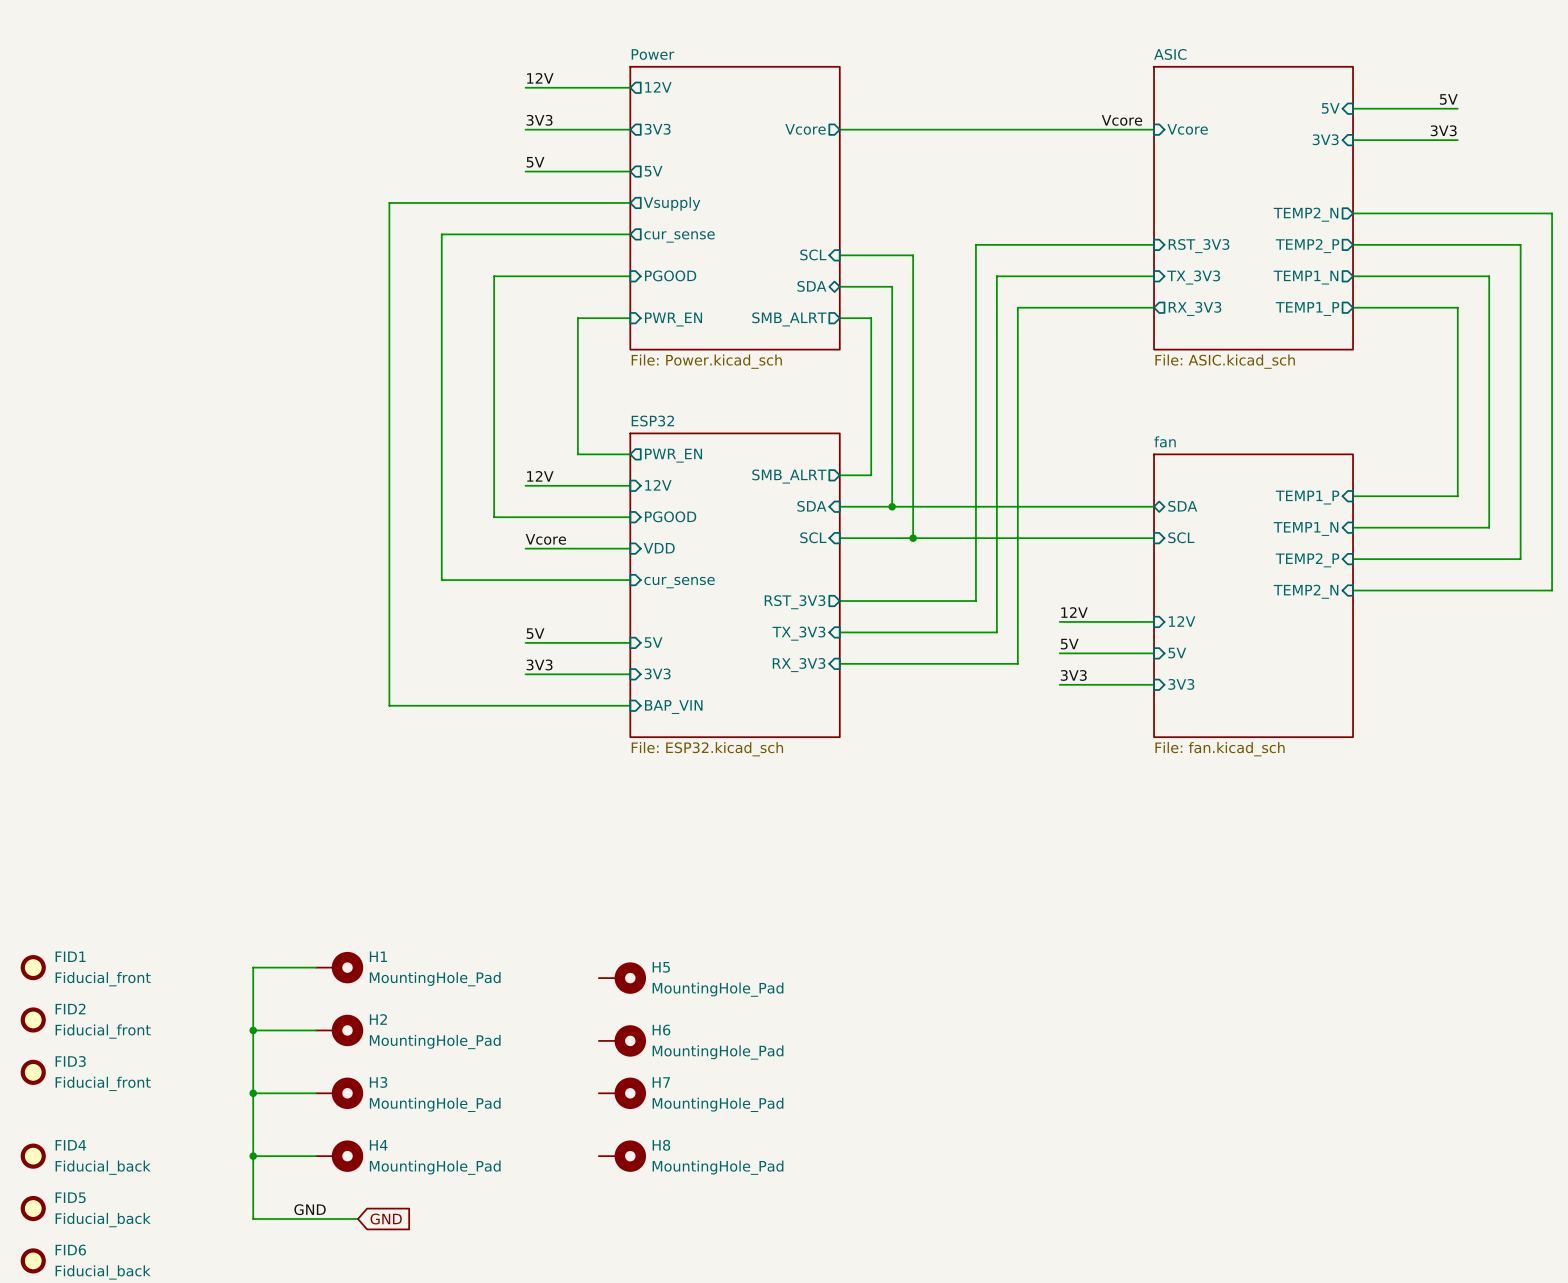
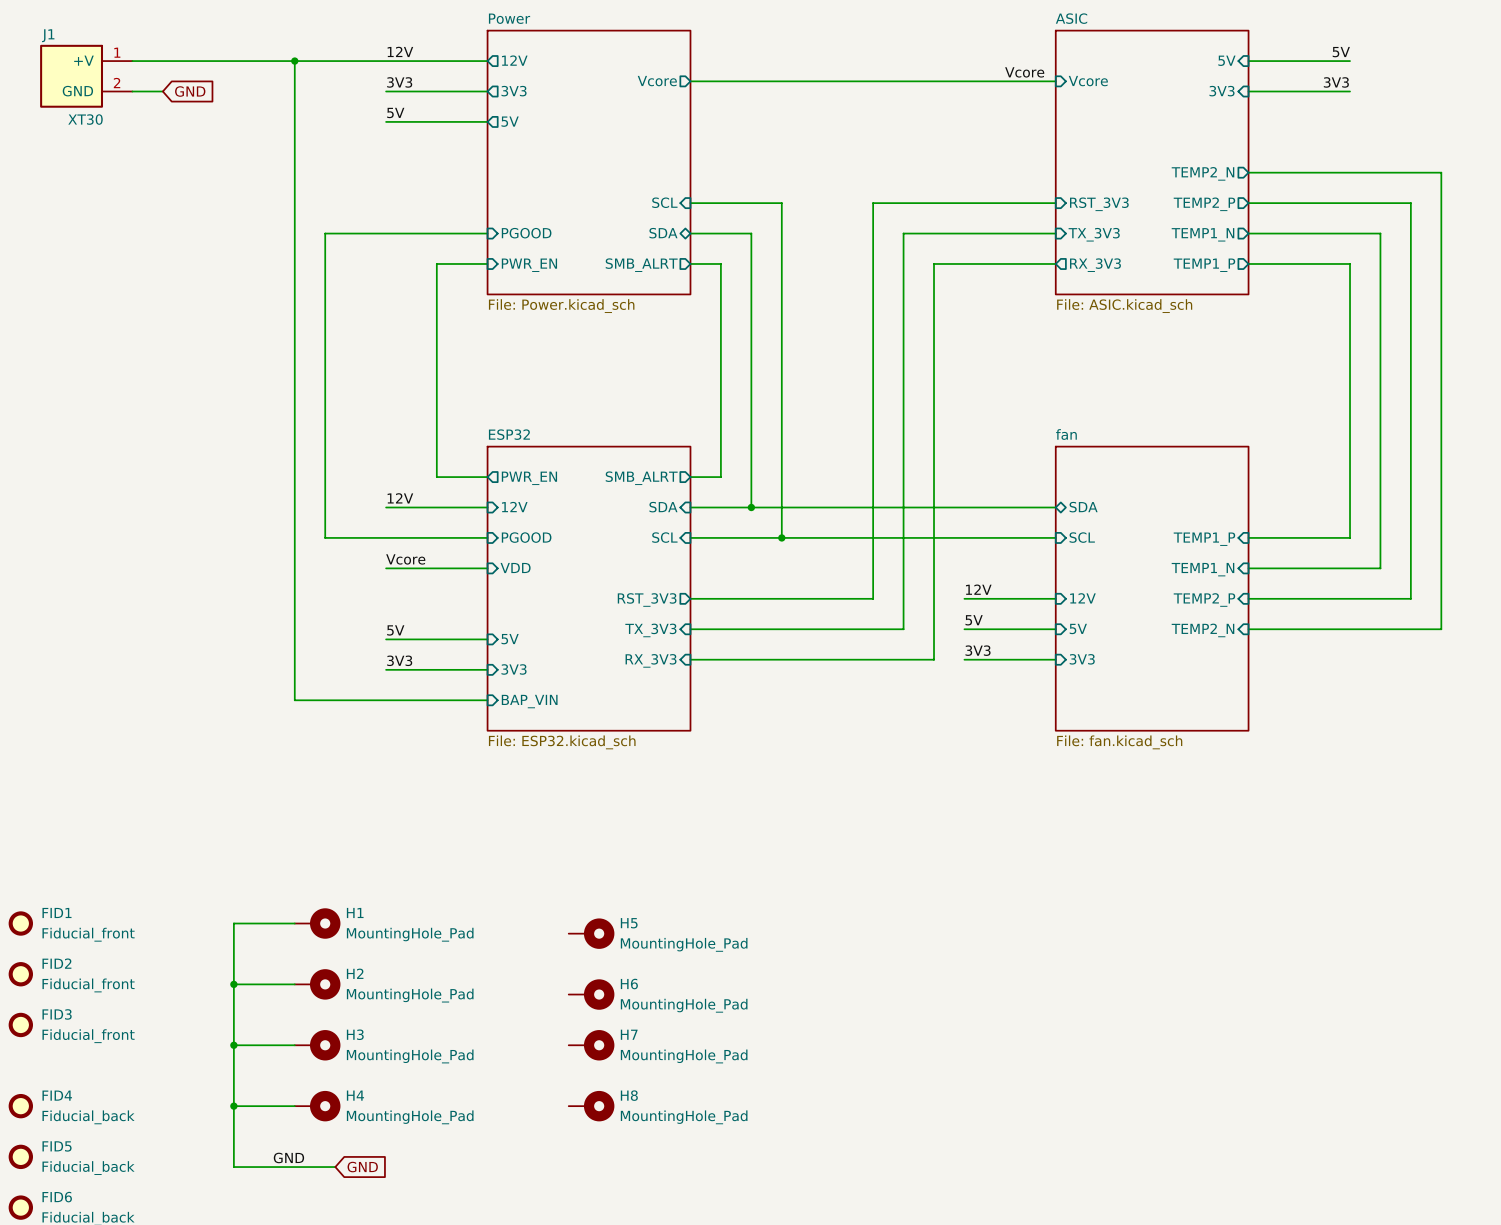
wire: none -> (132, 61) (487, 61)
wire: none -> (294, 61) (294, 700) (487, 700)
junction: none -> (294, 61)
label position: 12V (540, 78) -> 12V (400, 51)
wire: (525, 87) (630, 87) -> (386, 121) (487, 121)
sheet pin position: 12V (658, 87) -> 12V (514, 60)
J1: none -> XT30 (86, 76)
wire: none -> (690, 81) (1055, 81)
label position: 5V (1448, 99) -> 5V (1341, 52)
wire: none -> (132, 91) (162, 91)
global label: none -> GND (190, 91)
sheet pin position: 5V (1330, 108) -> 5V (1226, 60)
wire: (1405, 108) (1457, 108) -> (1248, 91) (1299, 91)
label position: 3V3 (539, 120) -> 3V3 (399, 82)
label position: Vcore (1121, 120) -> Vcore (1024, 72)
wire: (525, 129) (630, 129) -> (386, 91) (487, 91)
sheet pin position: 3V3 (657, 129) -> 3V3 (514, 91)
sheet pin position: Vcore (805, 129) -> Vcore (657, 81)
wire: (839, 129) (1154, 129) -> none
sheet pin position: Vcore (1187, 129) -> Vcore (1088, 81)
label position: 3V3 (1443, 130) -> 3V3 (1336, 82)
sheet pin position: 3V3 (1325, 139) -> 3V3 (1222, 91)
wire: (1353, 140) (1457, 140) -> (1248, 61) (1350, 61)
label position: 5V (535, 162) -> 5V (395, 112)
wire: (525, 171) (630, 171) -> none
sheet pin position: 5V (653, 171) -> 5V (510, 121)
sheet Power: none -> File: Power.kicad_sch (589, 162)
sheet ASIC: none -> File: ASIC.kicad_sch (1152, 162)
wire: none -> (1248, 172) (1441, 172) (1441, 629) (1248, 629)
wire: (630, 202) (389, 202) (389, 705) (410, 705) -> none
sheet pin: Vsupply (672, 203) -> none
sheet Power: File: Power.kicad_sch (735, 208) -> none
sheet ASIC: File: ASIC.kicad_sch (1253, 208) -> none
wire: (1353, 213) (1552, 213) (1552, 590) (1353, 590) -> none
sheet pin position: TEMP2_N (1306, 214) -> TEMP2_N (1202, 173)
wire: none -> (690, 203) (781, 203) (781, 537)
wire: none -> (1248, 203) (1410, 203) (1410, 598) (1248, 598)
wire: (630, 234) (441, 234) (441, 580) (630, 580) -> none
sheet pin: cur_sense (679, 236) -> none
wire: (1154, 244) (975, 244) (975, 286) -> (1055, 263) (934, 263)
wire: (1353, 244) (1520, 244) (1520, 559) (1353, 559) -> none
sheet pin position: RST_3V3 (1199, 246) -> RST_3V3 (1099, 204)
sheet pin position: TEMP2_P (1307, 246) -> TEMP2_P (1204, 204)
sheet pin position: SCL (813, 254) -> SCL (664, 202)
wire: none -> (487, 233) (325, 233) (325, 537) (487, 537)
wire: none -> (690, 233) (751, 233) (751, 507)
wire: (839, 255) (913, 255) -> (1055, 203) (873, 203) (873, 233)
wire: none -> (1248, 233) (1380, 233) (1380, 568) (1248, 568)
sheet pin position: PGOOD (670, 275) -> PGOOD (526, 233)
wire: (630, 276) (494, 276) (494, 517) (630, 517) -> none
wire: (1154, 276) (996, 276) (996, 632) (913, 632) -> (873, 507) (873, 598)
wire: (1353, 276) (1489, 276) (1489, 527) (1353, 527) -> none
sheet pin position: TX_3V3 (1193, 277) -> TX_3V3 (1094, 234)
sheet pin position: TEMP1_N (1306, 277) -> TEMP1_N (1202, 234)
wire: none -> (487, 263) (436, 263) (436, 477) (487, 477)
wire: none -> (690, 263) (720, 263) (720, 477) (690, 477)
sheet pin position: SDA (811, 286) -> SDA (663, 233)
wire: (839, 286) (892, 286) (892, 506) -> none
wire: none -> (1248, 263) (1350, 263) (1350, 537) (1248, 537)
sheet pin: none -> SMB_ALRT (641, 265)
sheet pin: none -> PWR_EN (529, 265)
wire: (1154, 307) (1017, 307) (1017, 663) -> (1055, 629) (974, 629)
wire: (1353, 307) (1457, 307) (1457, 496) (1353, 496) -> none
sheet pin position: RX_3V3 (1195, 308) -> RX_3V3 (1095, 265)
sheet pin position: TEMP1_P (1307, 309) -> TEMP1_P (1204, 265)
wire: (630, 318) (577, 318) (577, 454) (630, 454) -> none
wire: (839, 318) (871, 318) (871, 475) (839, 475) -> none
sheet pin: PWR_EN (673, 319) -> none
sheet pin: SMB_ALRT (789, 319) -> none
sheet ESP32 shape: [629, 432, 841, 738] -> [486, 446, 692, 732]
sheet pin: PWR_EN (673, 455) -> none
label position: 12V (540, 476) -> 12V (400, 498)
sheet pin: SMB_ALRT (789, 476) -> none
wire: (525, 485) (630, 485) -> (386, 507) (487, 507)
sheet pin position: 12V (658, 485) -> 12V (514, 507)
sheet pin position: TEMP1_P (1307, 497) -> TEMP1_P (1204, 539)
sheet pin position: SDA (811, 506) -> SDA (663, 507)
wire: (839, 506) (1154, 506) -> none
junction: (892, 506) -> none
sheet pin position: SDA (1182, 506) -> SDA (1083, 507)
sheet pin: none -> SMB_ALRT (641, 478)
sheet pin: none -> PWR_EN (529, 478)
sheet pin position: PGOOD (670, 516) -> PGOOD (526, 537)
sheet pin position: TEMP1_N (1306, 528) -> TEMP1_N (1202, 569)
sheet pin position: SCL (813, 537) -> SCL (664, 537)
sheet pin position: SCL (1181, 537) -> SCL (1082, 537)
wire: none -> (690, 507) (802, 507)
junction: none -> (751, 507)
junction: (913, 538) -> none
wire: (1101, 538) (1154, 538) -> none
label position: Vcore (545, 539) -> Vcore (405, 559)
wire: (525, 548) (630, 548) -> (386, 568) (487, 568)
sheet pin position: VDD (659, 548) -> VDD (515, 568)
sheet pin position: TEMP2_P (1307, 560) -> TEMP2_P (1204, 599)
wire: none -> (690, 537) (1055, 537)
junction: none -> (781, 537)
sheet pin: cur_sense (679, 582) -> none
sheet pin position: TEMP2_N (1306, 591) -> TEMP2_N (1202, 630)
sheet fan: File: fan.kicad_sch (1253, 595) -> none
wire: (839, 601) (975, 601) -> (690, 659) (934, 659) (934, 568)
sheet pin position: RST_3V3 (795, 602) -> RST_3V3 (647, 599)
label position: 12V (1074, 612) -> 12V (978, 589)
wire: (1059, 621) (1154, 621) -> (964, 598) (1055, 598)
sheet pin position: 12V (1182, 621) -> 12V (1082, 598)
sheet fan: none -> File: fan.kicad_sch (1152, 588)
wire: none -> (690, 598) (802, 598)
label position: 5V (535, 633) -> 5V (395, 630)
sheet pin position: TX_3V3 (798, 633) -> TX_3V3 (650, 630)
wire: (525, 642) (630, 642) -> none
sheet pin position: 5V (653, 642) -> 5V (510, 639)
label position: 5V (1069, 644) -> 5V (974, 620)
wire: (1059, 653) (1154, 653) -> none
sheet pin position: 5V (1177, 653) -> 5V (1078, 628)
wire: none -> (690, 629) (802, 629)
wire: (944, 663) (1007, 663) -> (903, 629) (903, 233) (1055, 233)
label position: 3V3 (539, 664) -> 3V3 (399, 660)
sheet pin position: RX_3V3 (799, 665) -> RX_3V3 (651, 660)
sheet pin position: 3V3 (657, 673) -> 3V3 (514, 669)
wire: (525, 674) (630, 674) -> (386, 639) (487, 639)
label position: 3V3 (1073, 675) -> 3V3 (978, 650)
wire: (1059, 684) (1154, 684) -> (964, 659) (1055, 659)
sheet pin position: 3V3 (1181, 684) -> 3V3 (1082, 659)
wire: (515, 705) (630, 705) -> none
sheet pin position: BAP_VIN (673, 707) -> BAP_VIN (529, 701)

